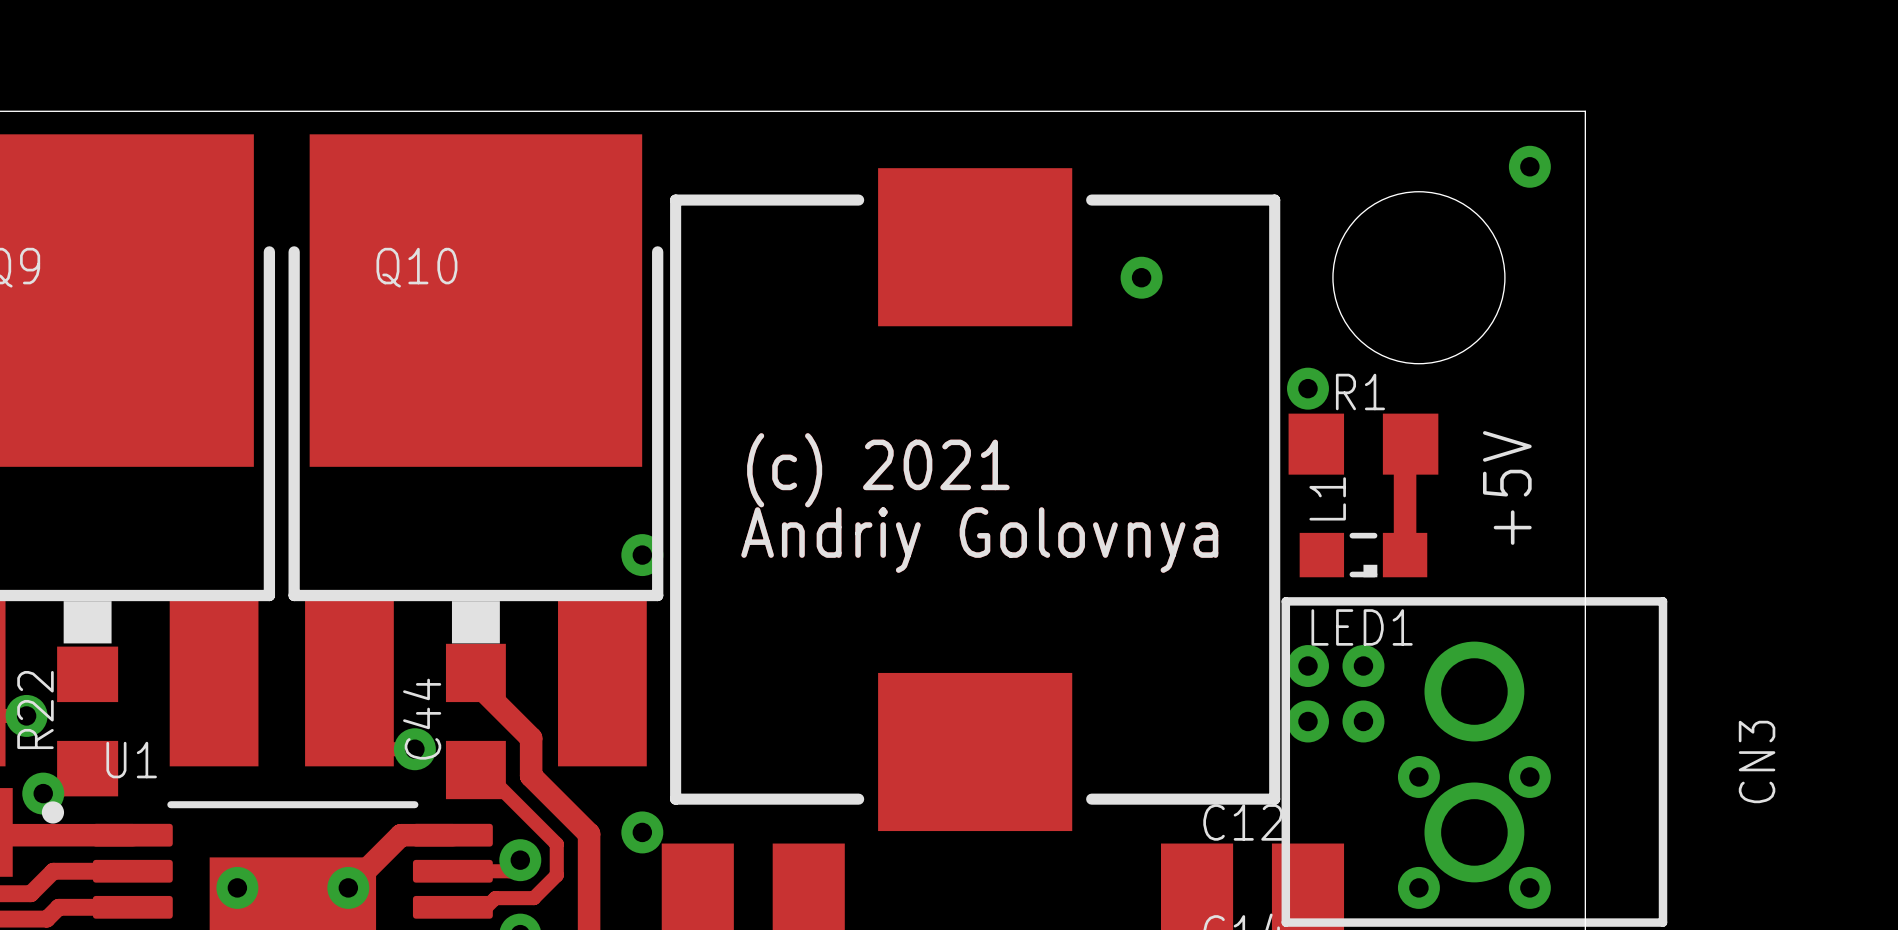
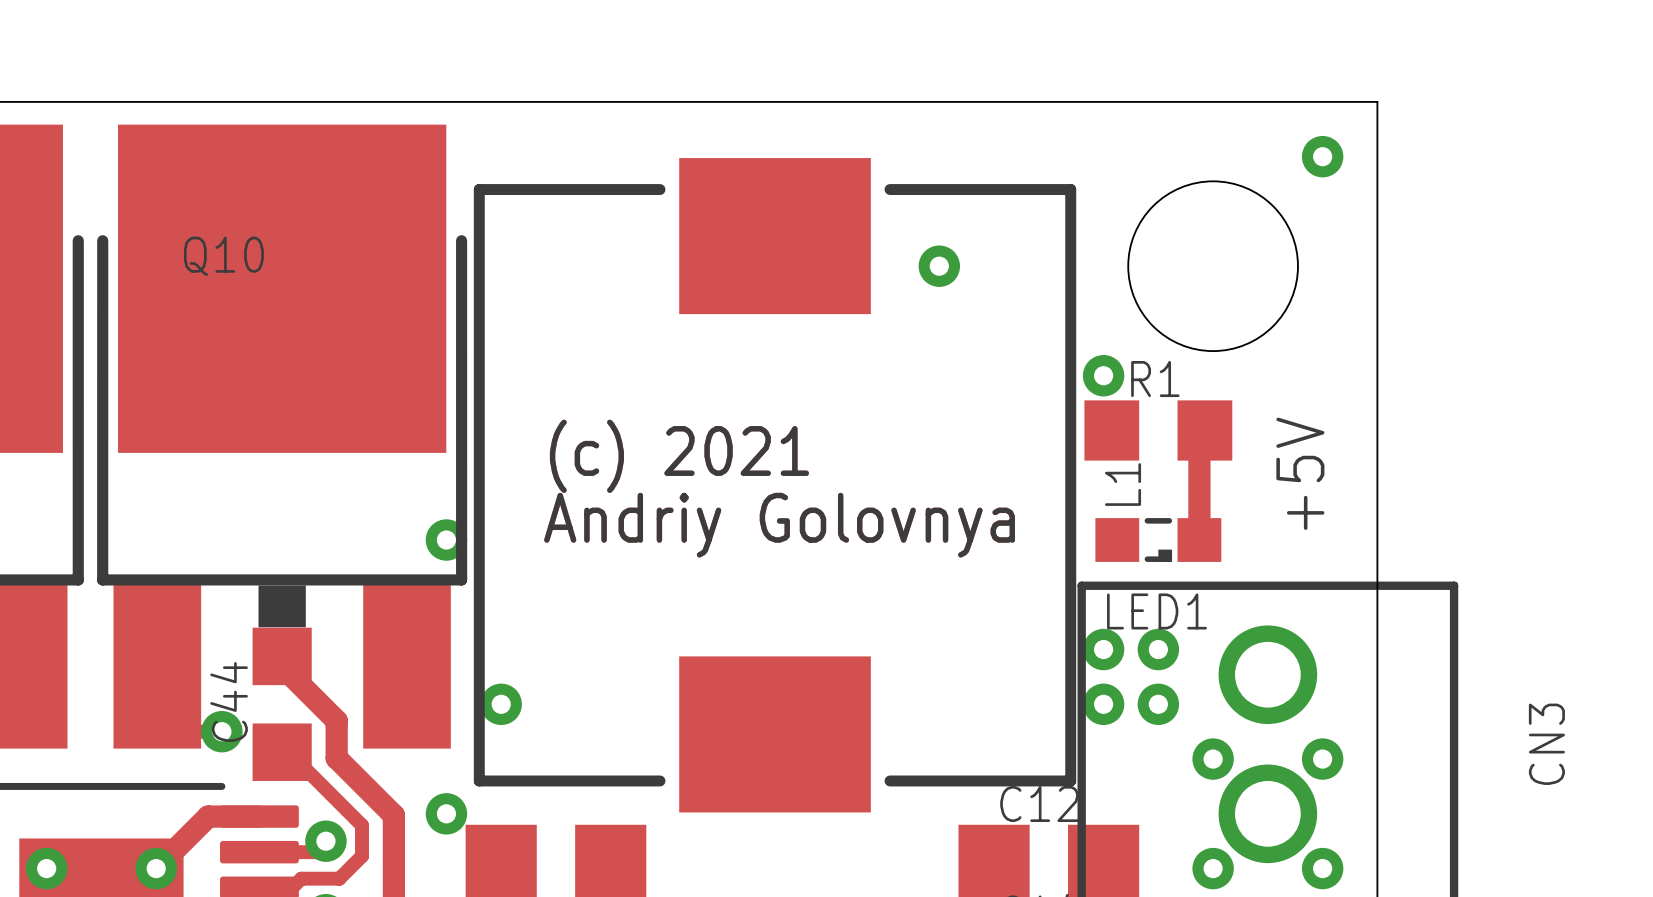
via: none -> (501, 704)

